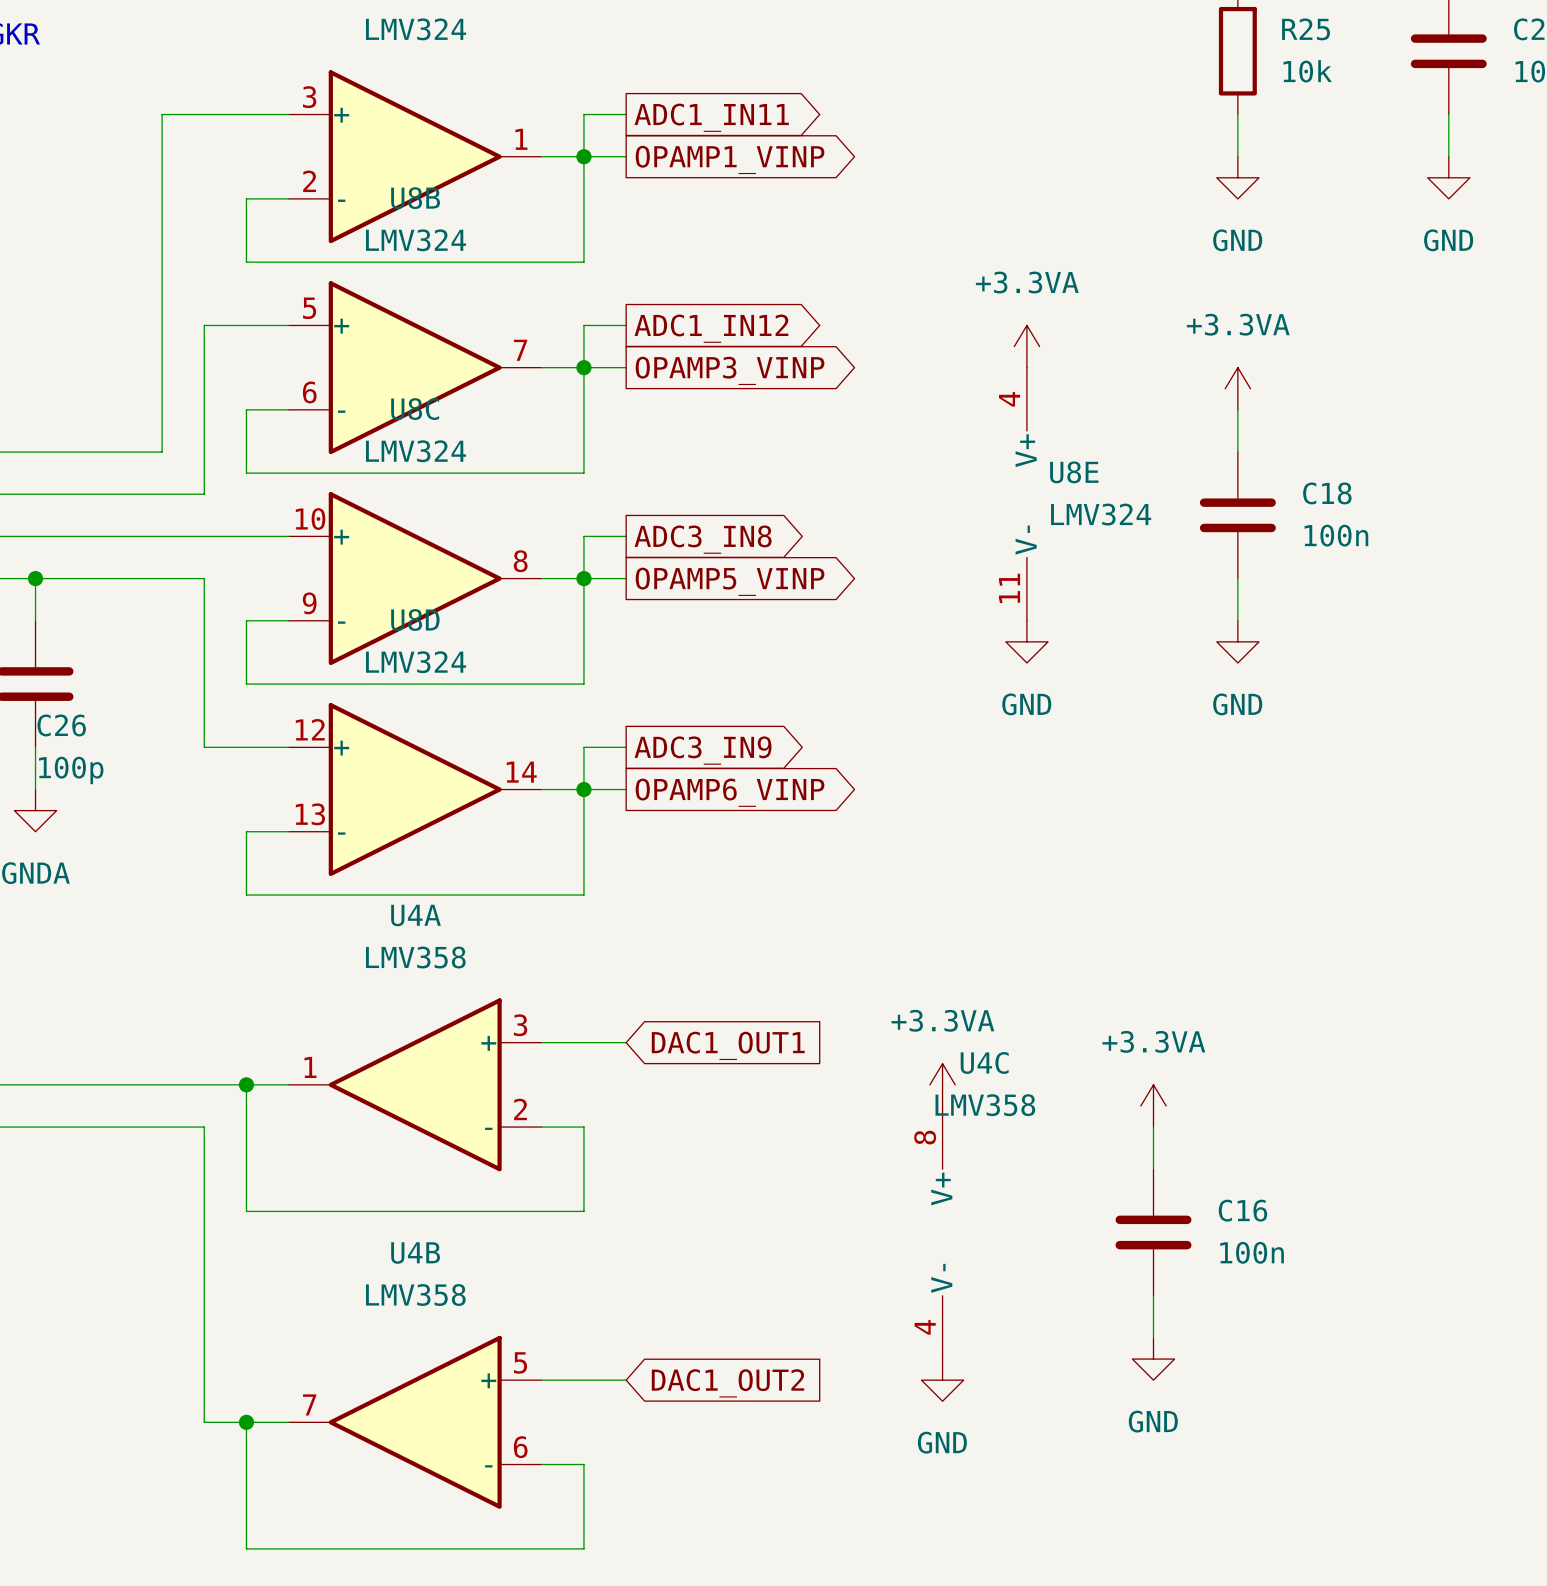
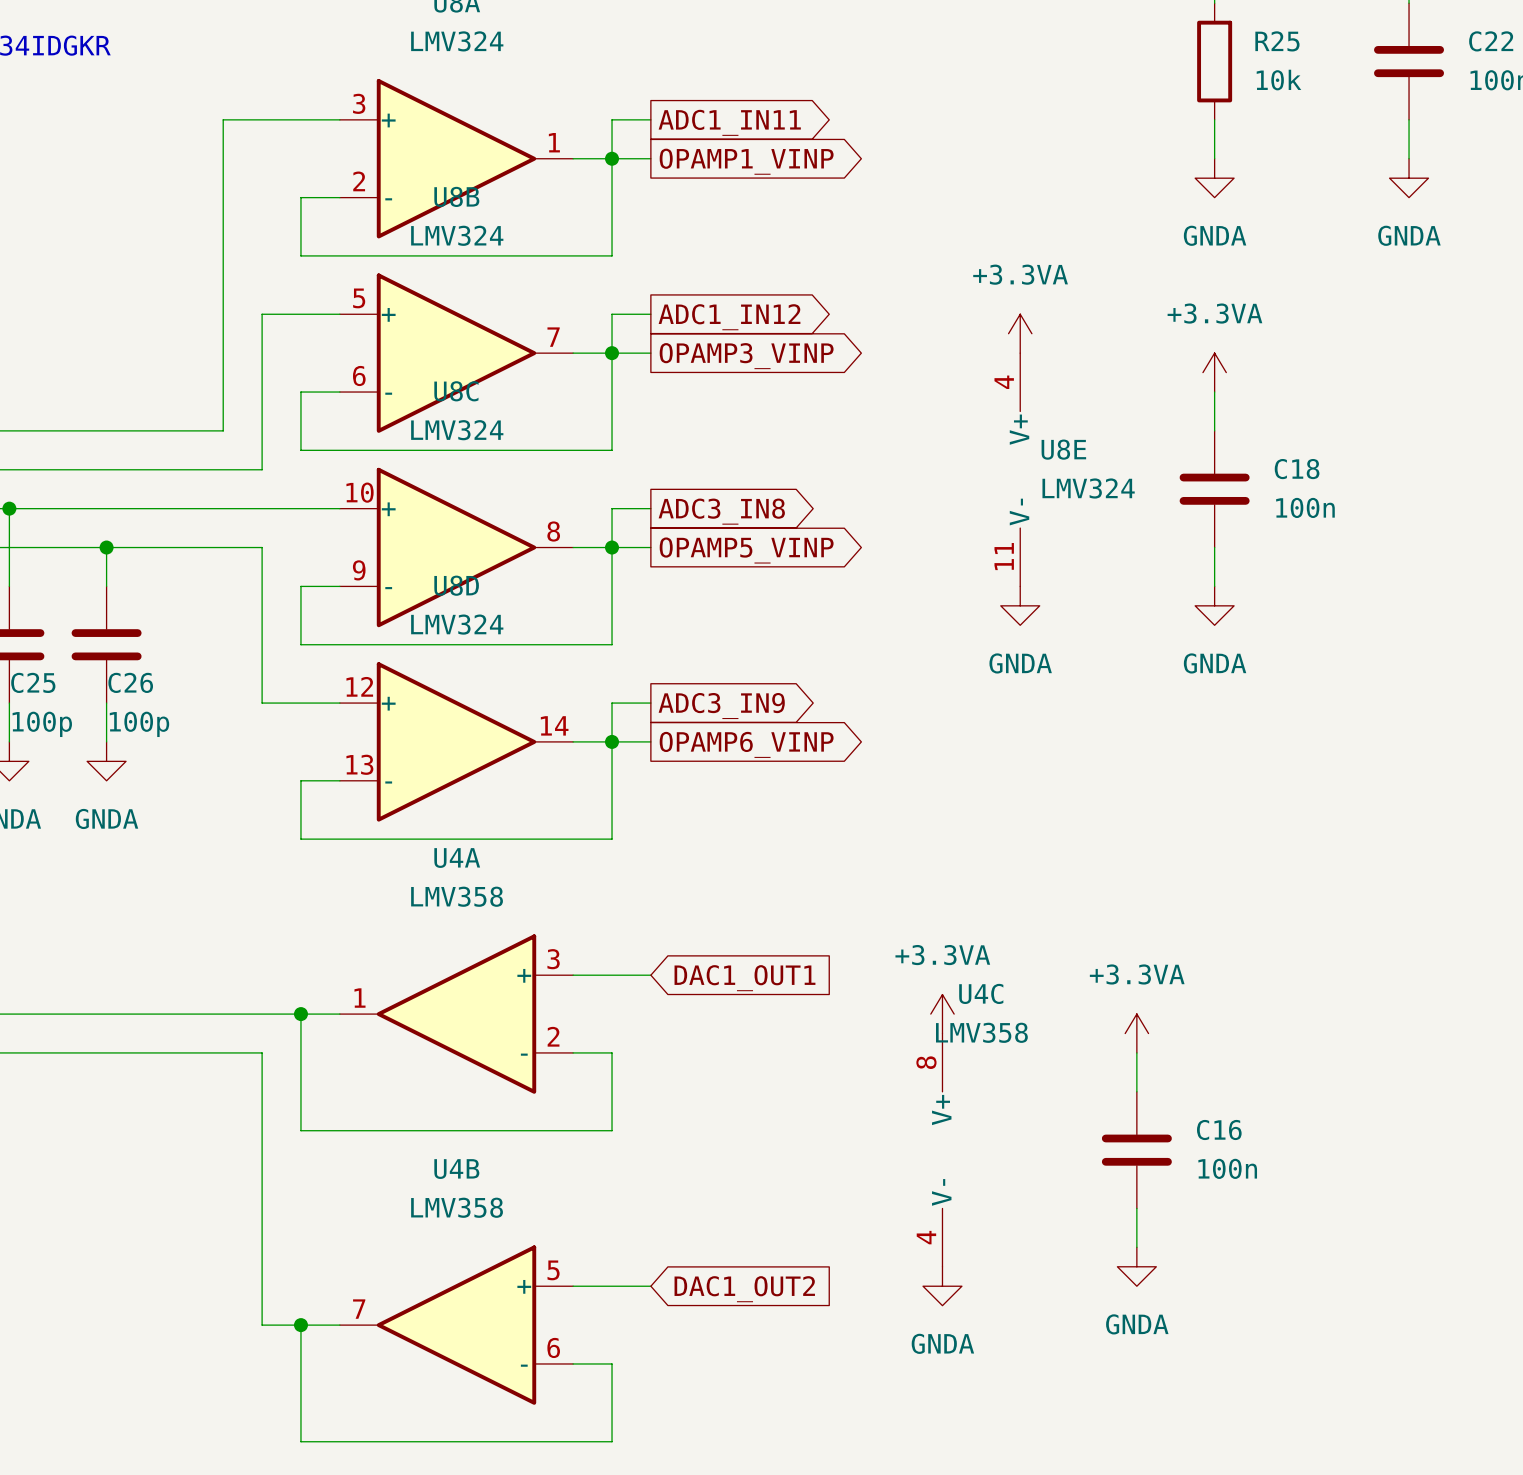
power symbol: GND (1237, 177) -> GNDA (1214, 178)
power symbol: GND (1448, 177) -> GNDA (1409, 178)
power symbol: GND (1026, 641) -> GNDA (1020, 605)
power symbol: GND (1237, 641) -> GNDA (1214, 605)
power symbol: GND (1153, 1359) -> GNDA (1136, 1266)
power symbol: GND (942, 1380) -> GNDA (942, 1286)

